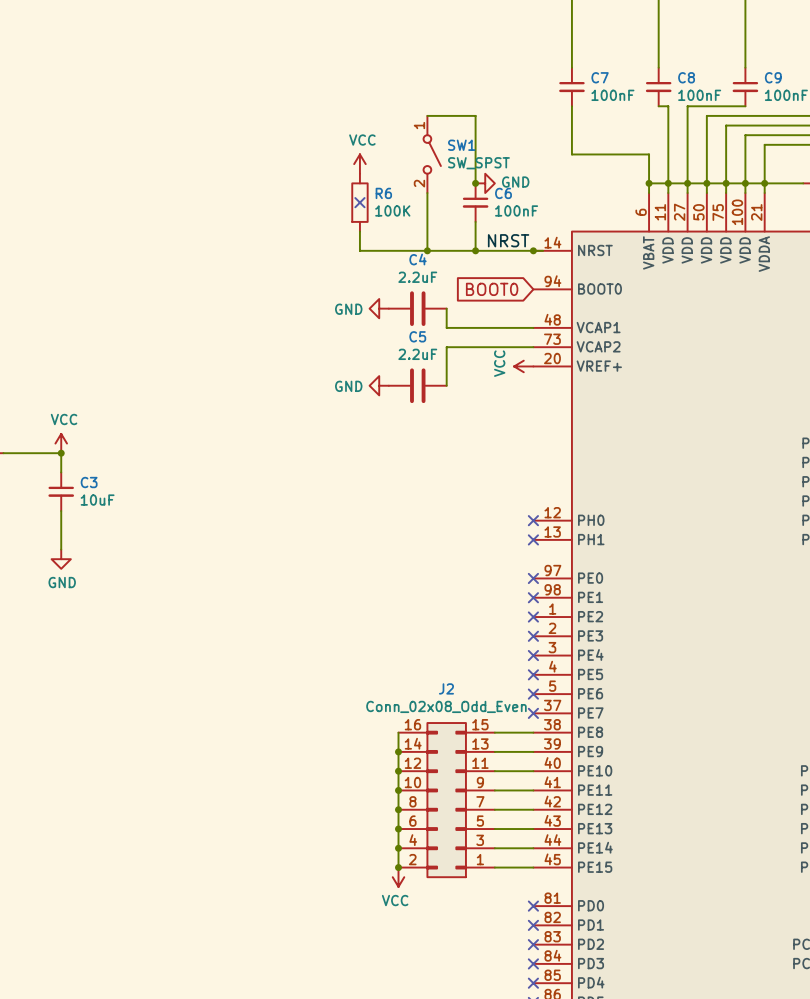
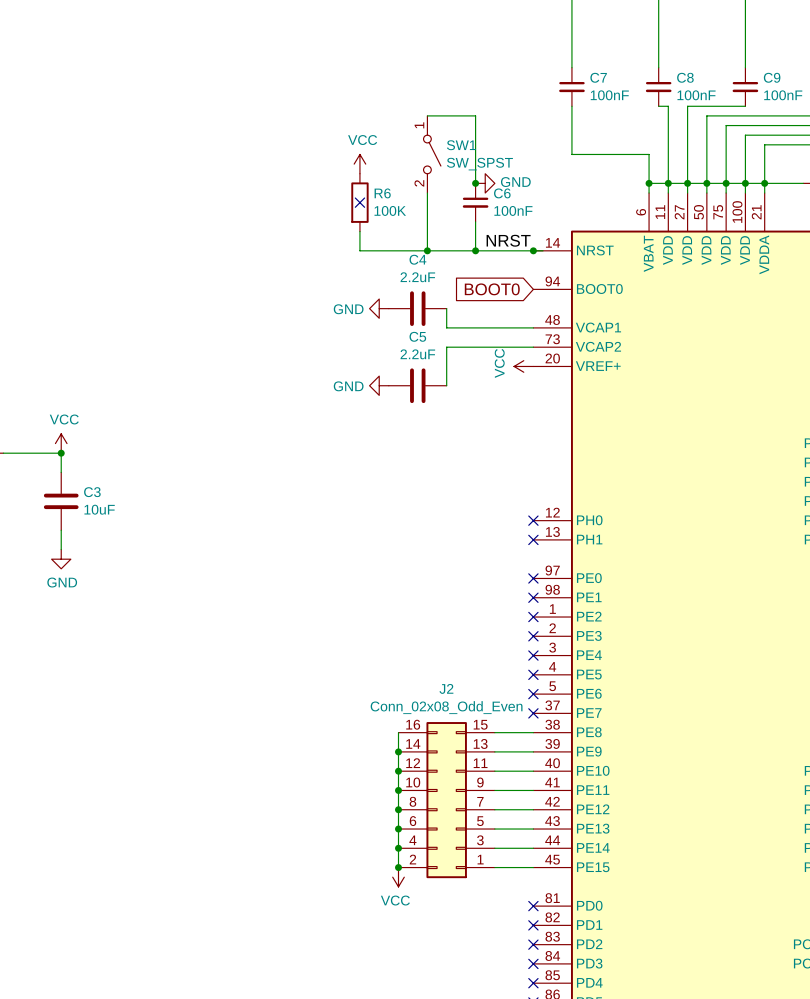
C3 symbol: [48, 472, 75, 512] -> [43, 472, 79, 531]

